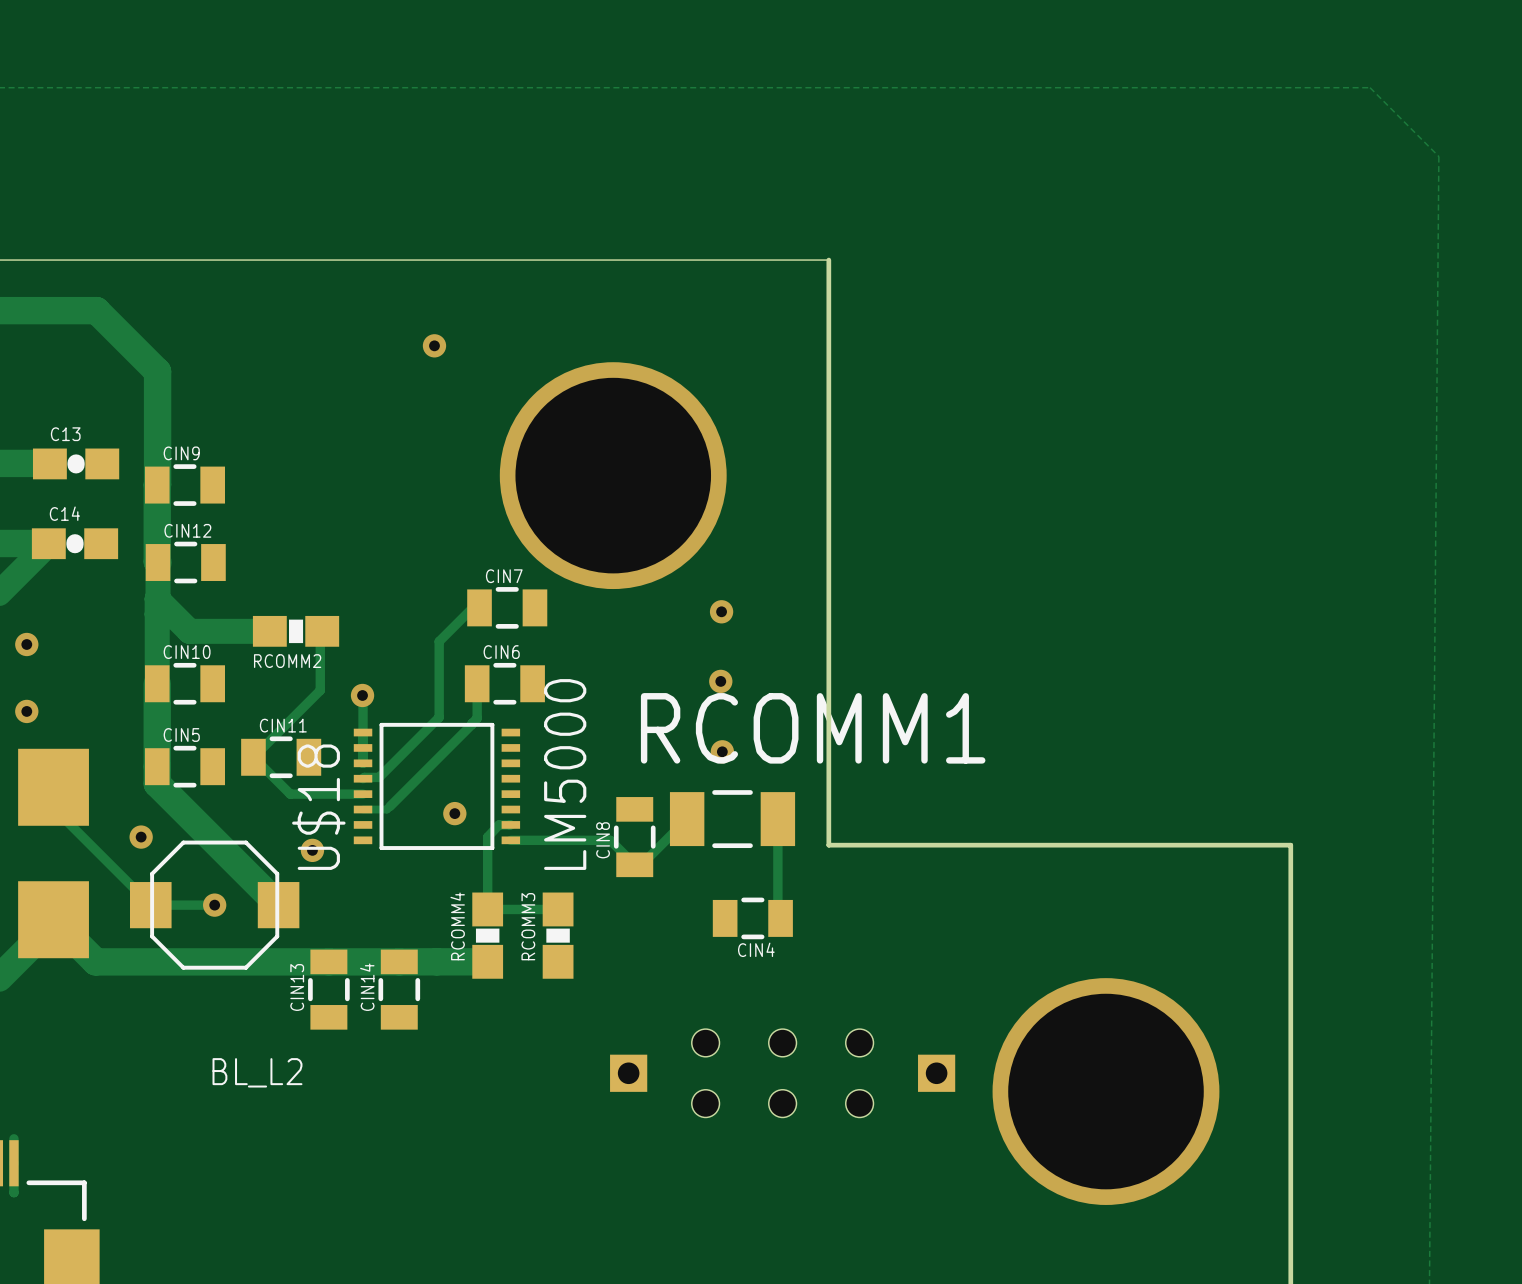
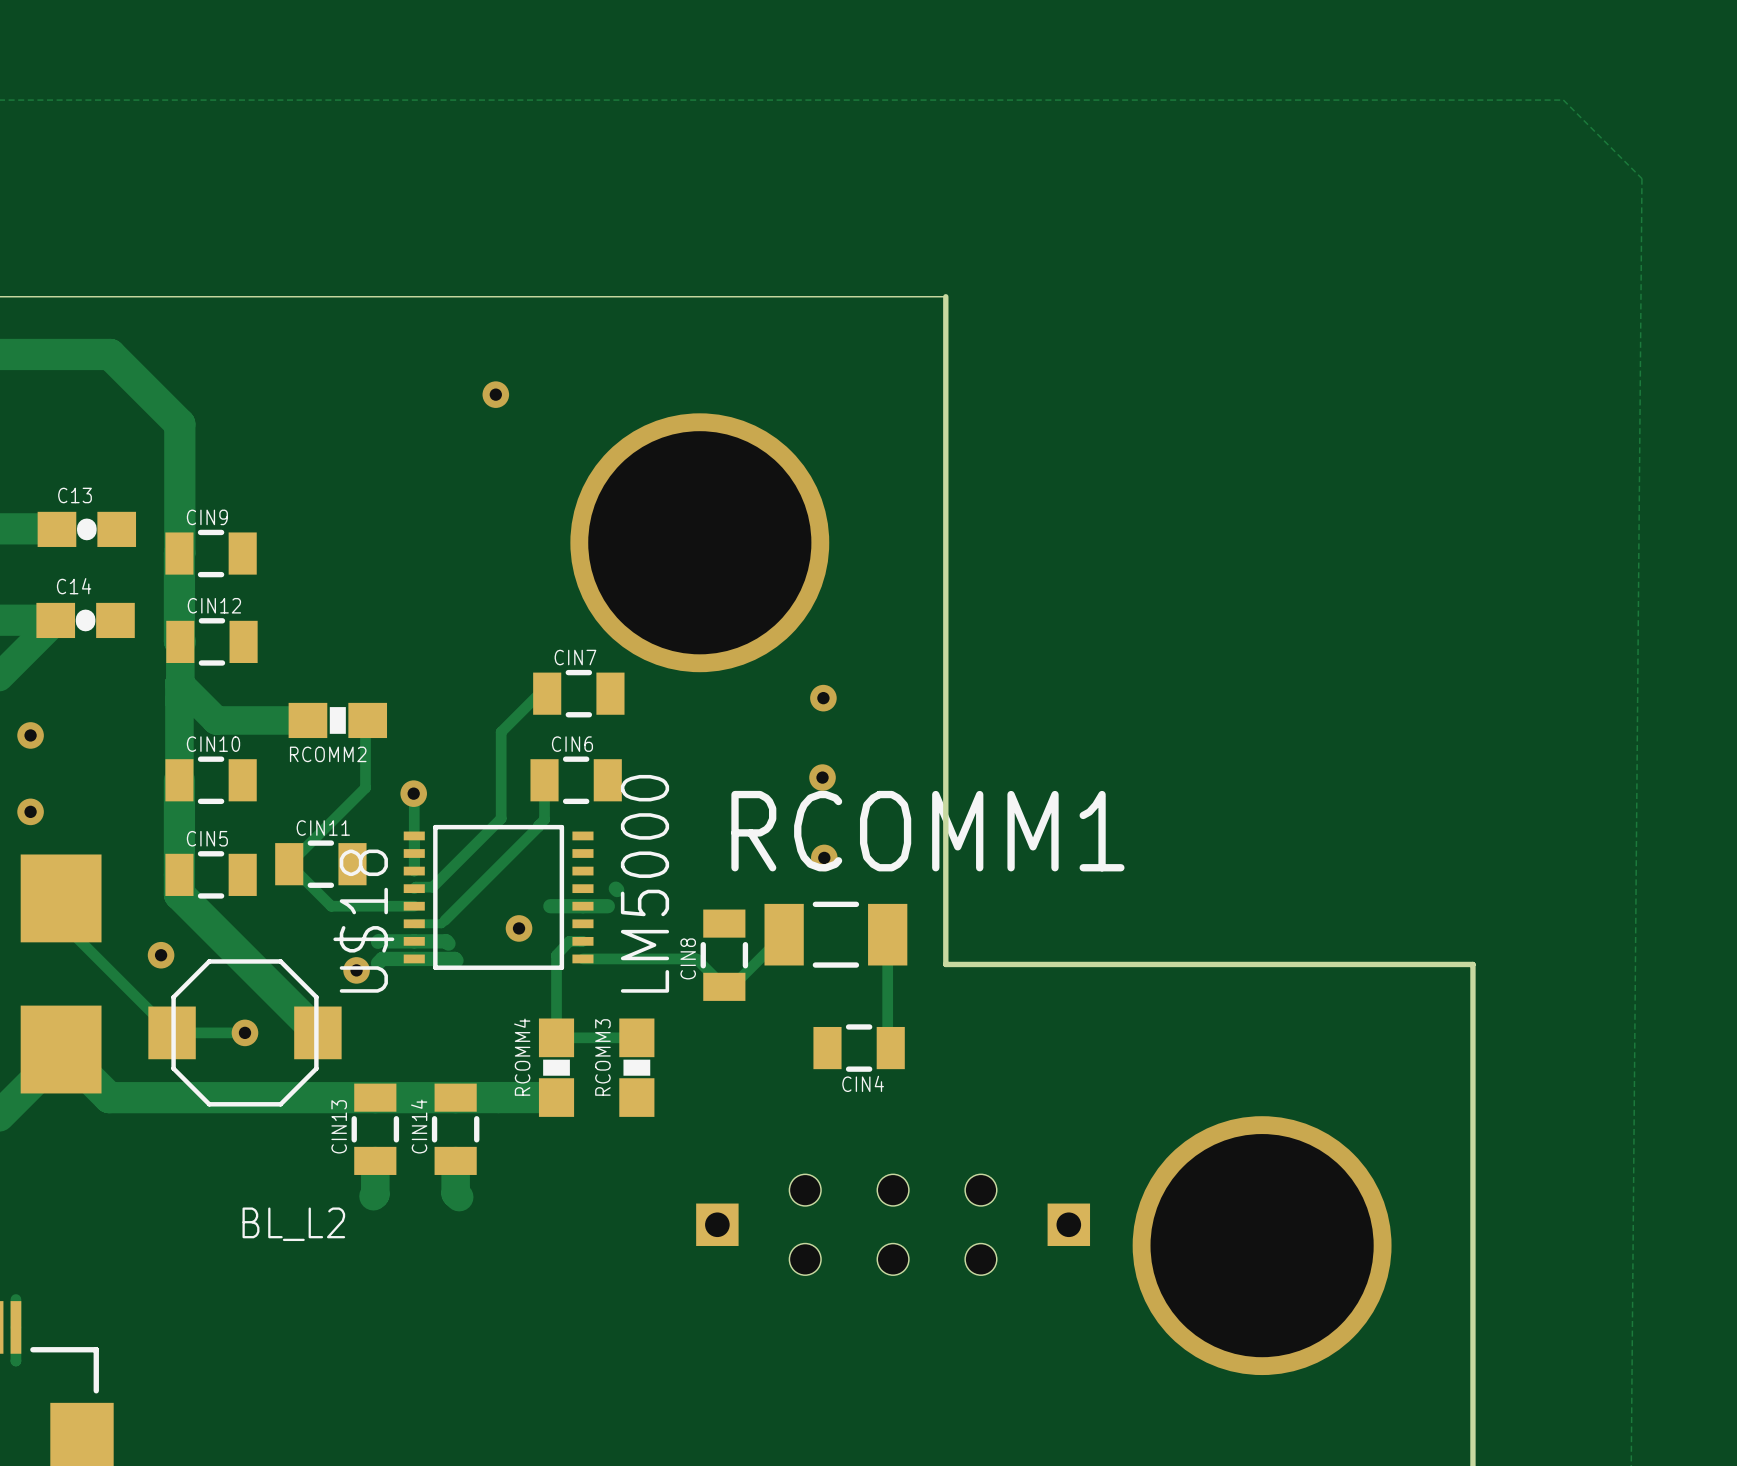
track: none -> (615, 888) (617, 890)
track: none -> (550, 906) (607, 906)
track: none -> (378, 940) (377, 941)
track: none -> (387, 941) (446, 941) (448, 943)
track: none -> (456, 960) (454, 958) (382, 958) (377, 963)
track: none -> (375, 1160) (375, 1194) (373, 1196)
track: none -> (455, 1160) (455, 1193) (459, 1197)

